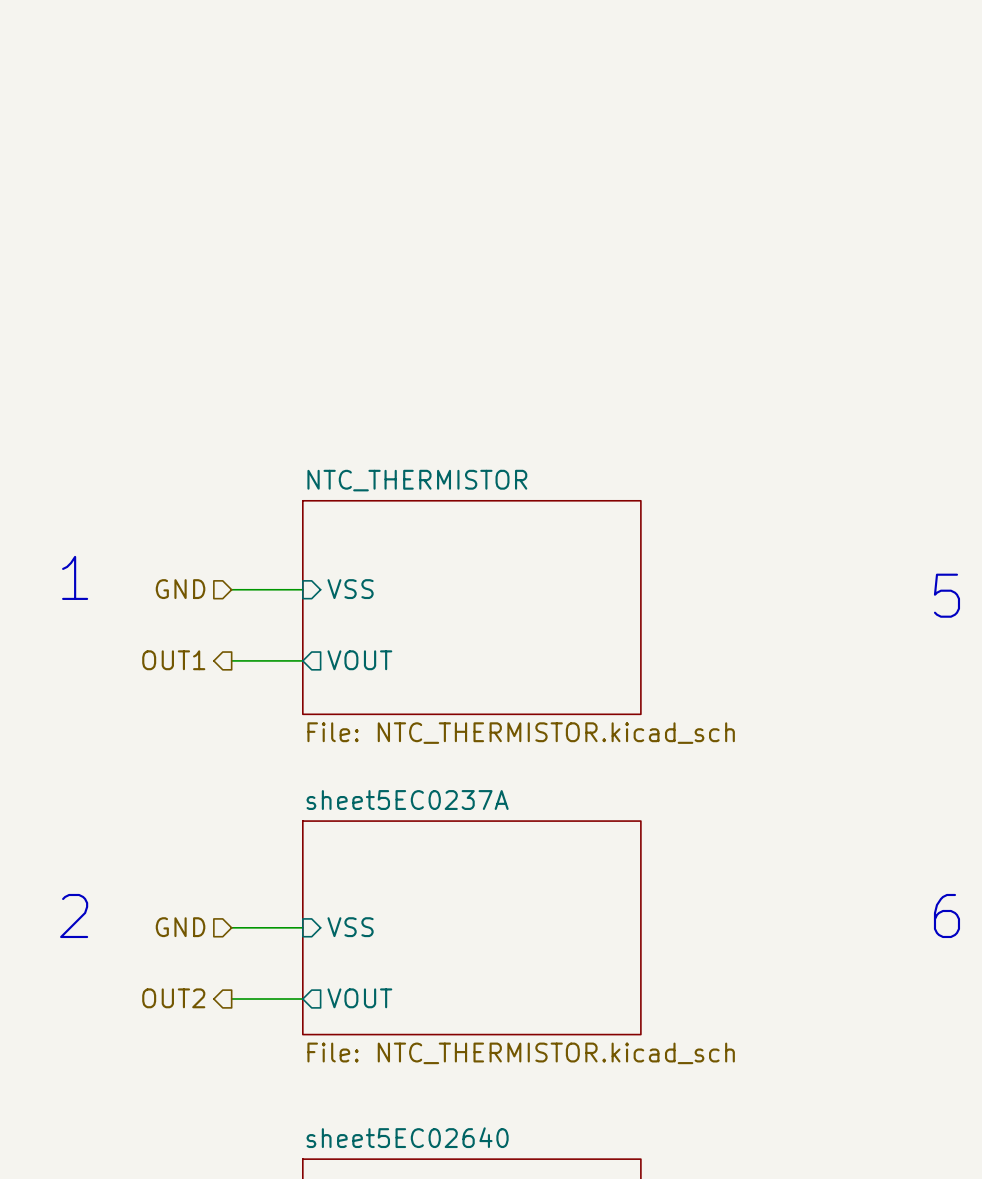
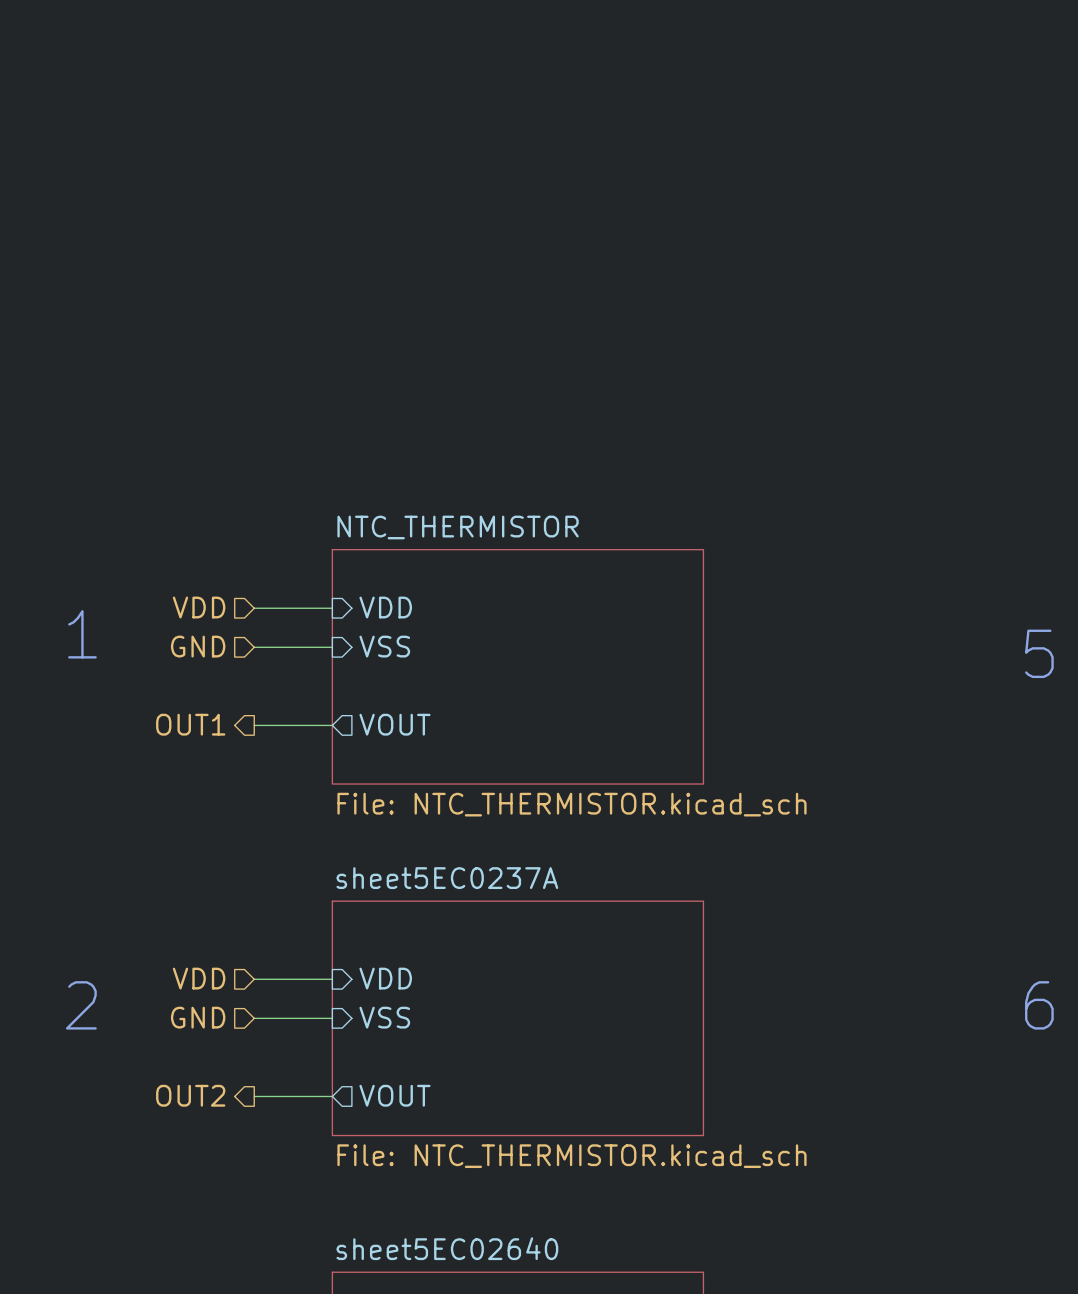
hierarchical label: none -> VDD (199, 607)
sheet pin: none -> VDD (385, 607)
wire: none -> (254, 608) (332, 608)
hierarchical label: none -> VDD (199, 978)
sheet pin: none -> VDD (385, 978)
wire: none -> (254, 979) (332, 979)

